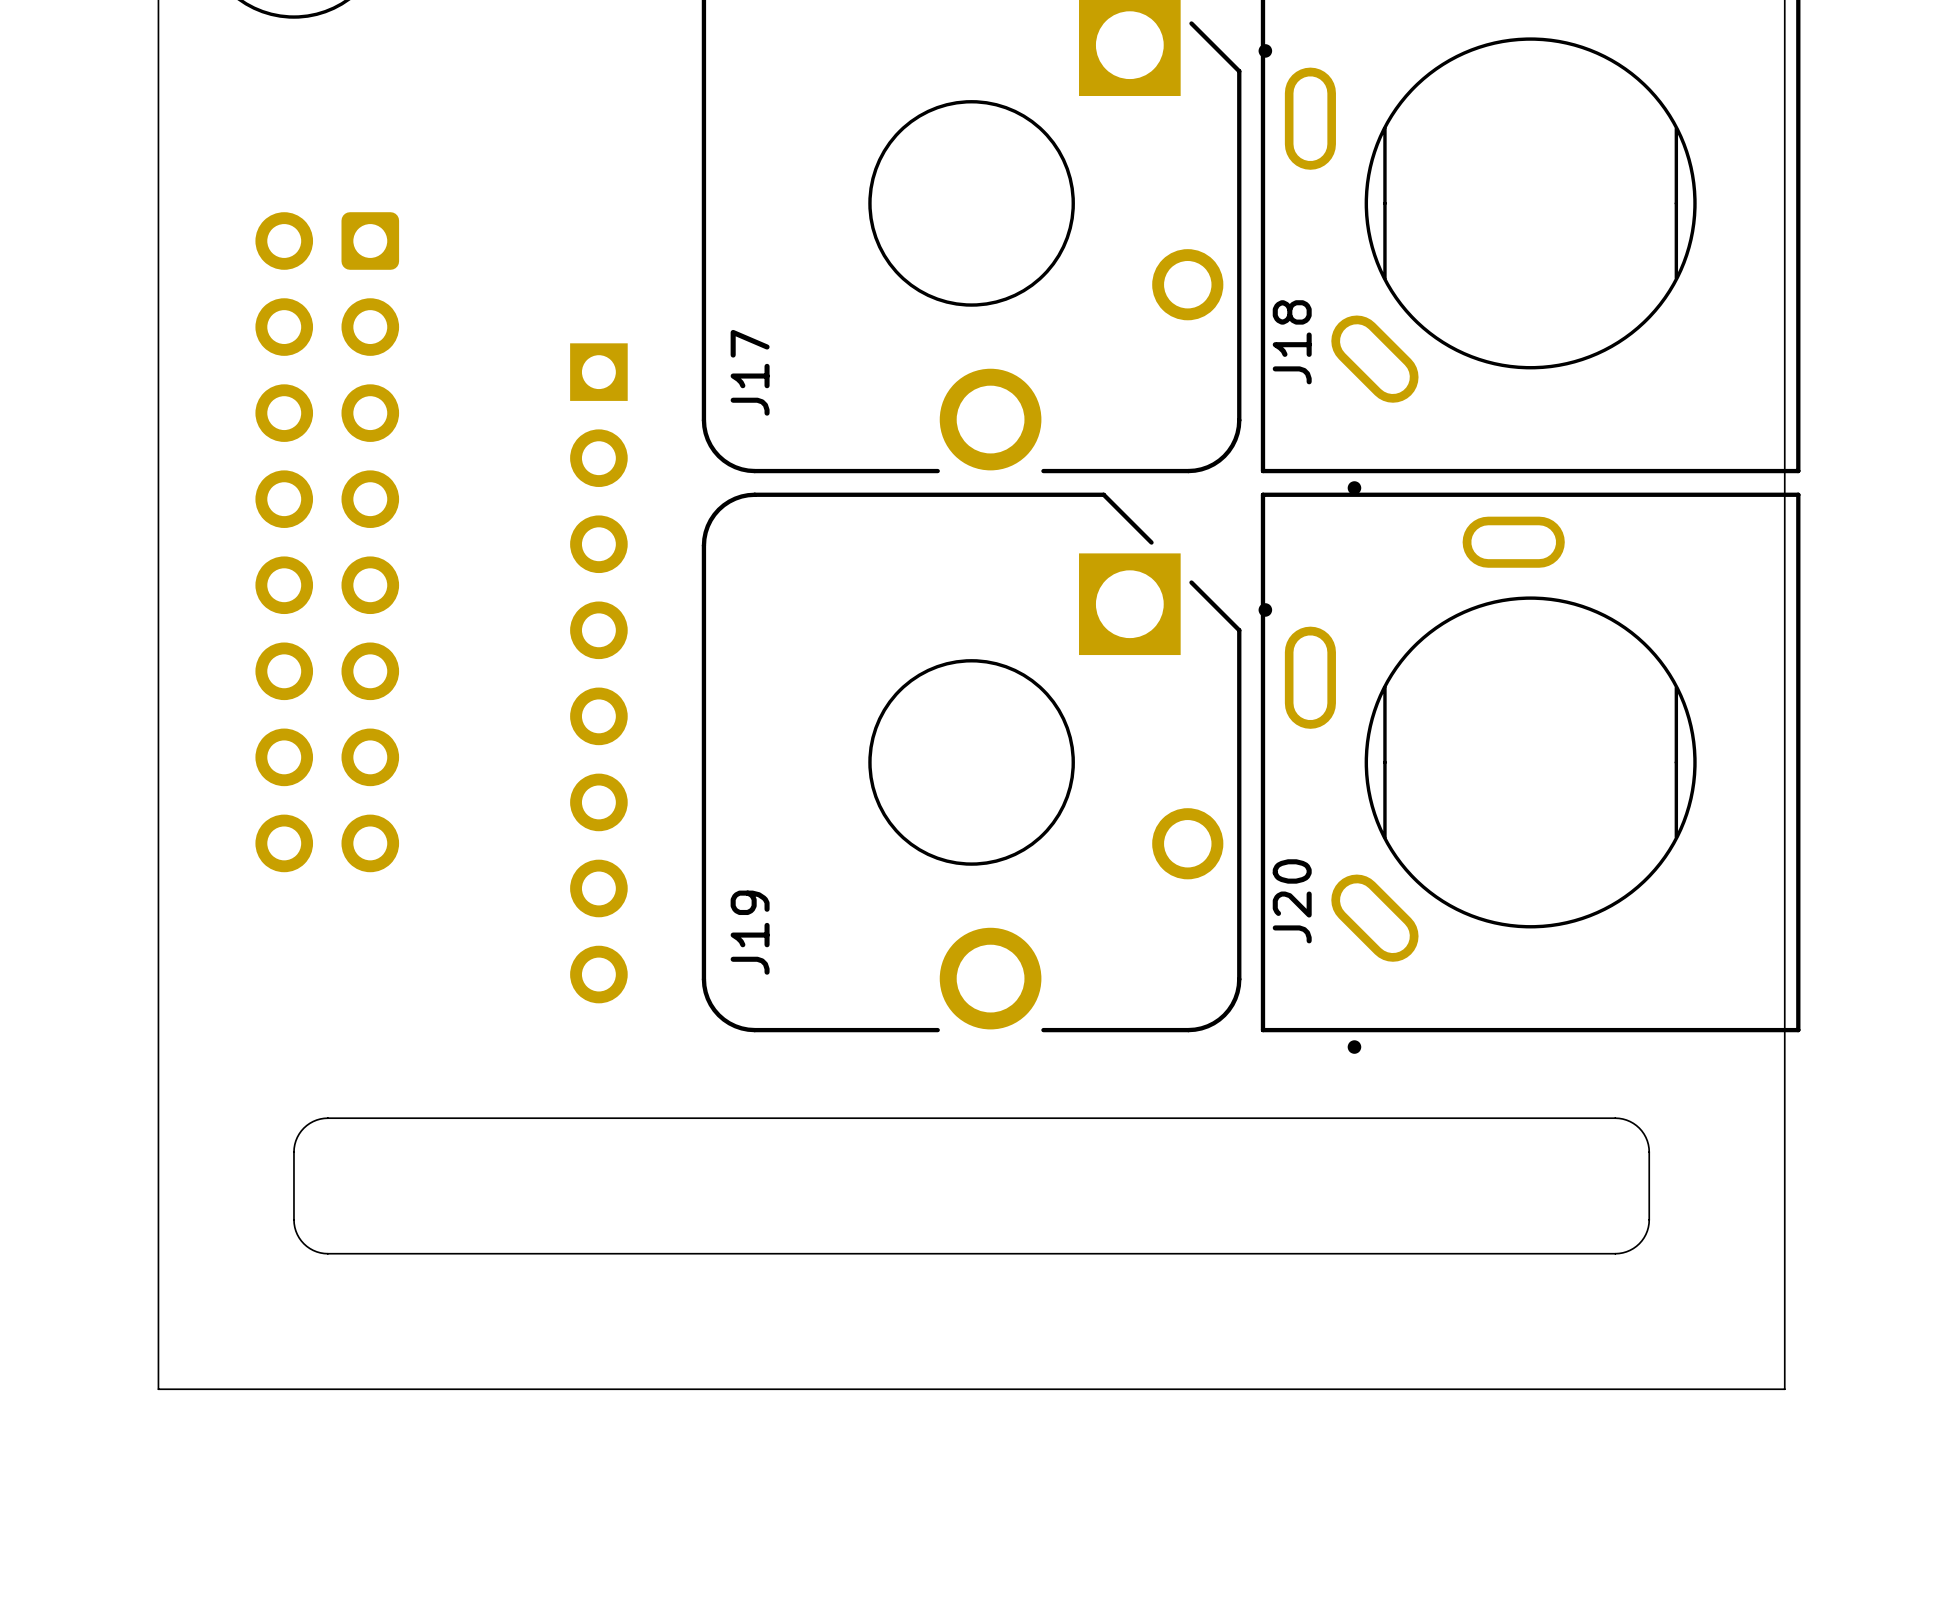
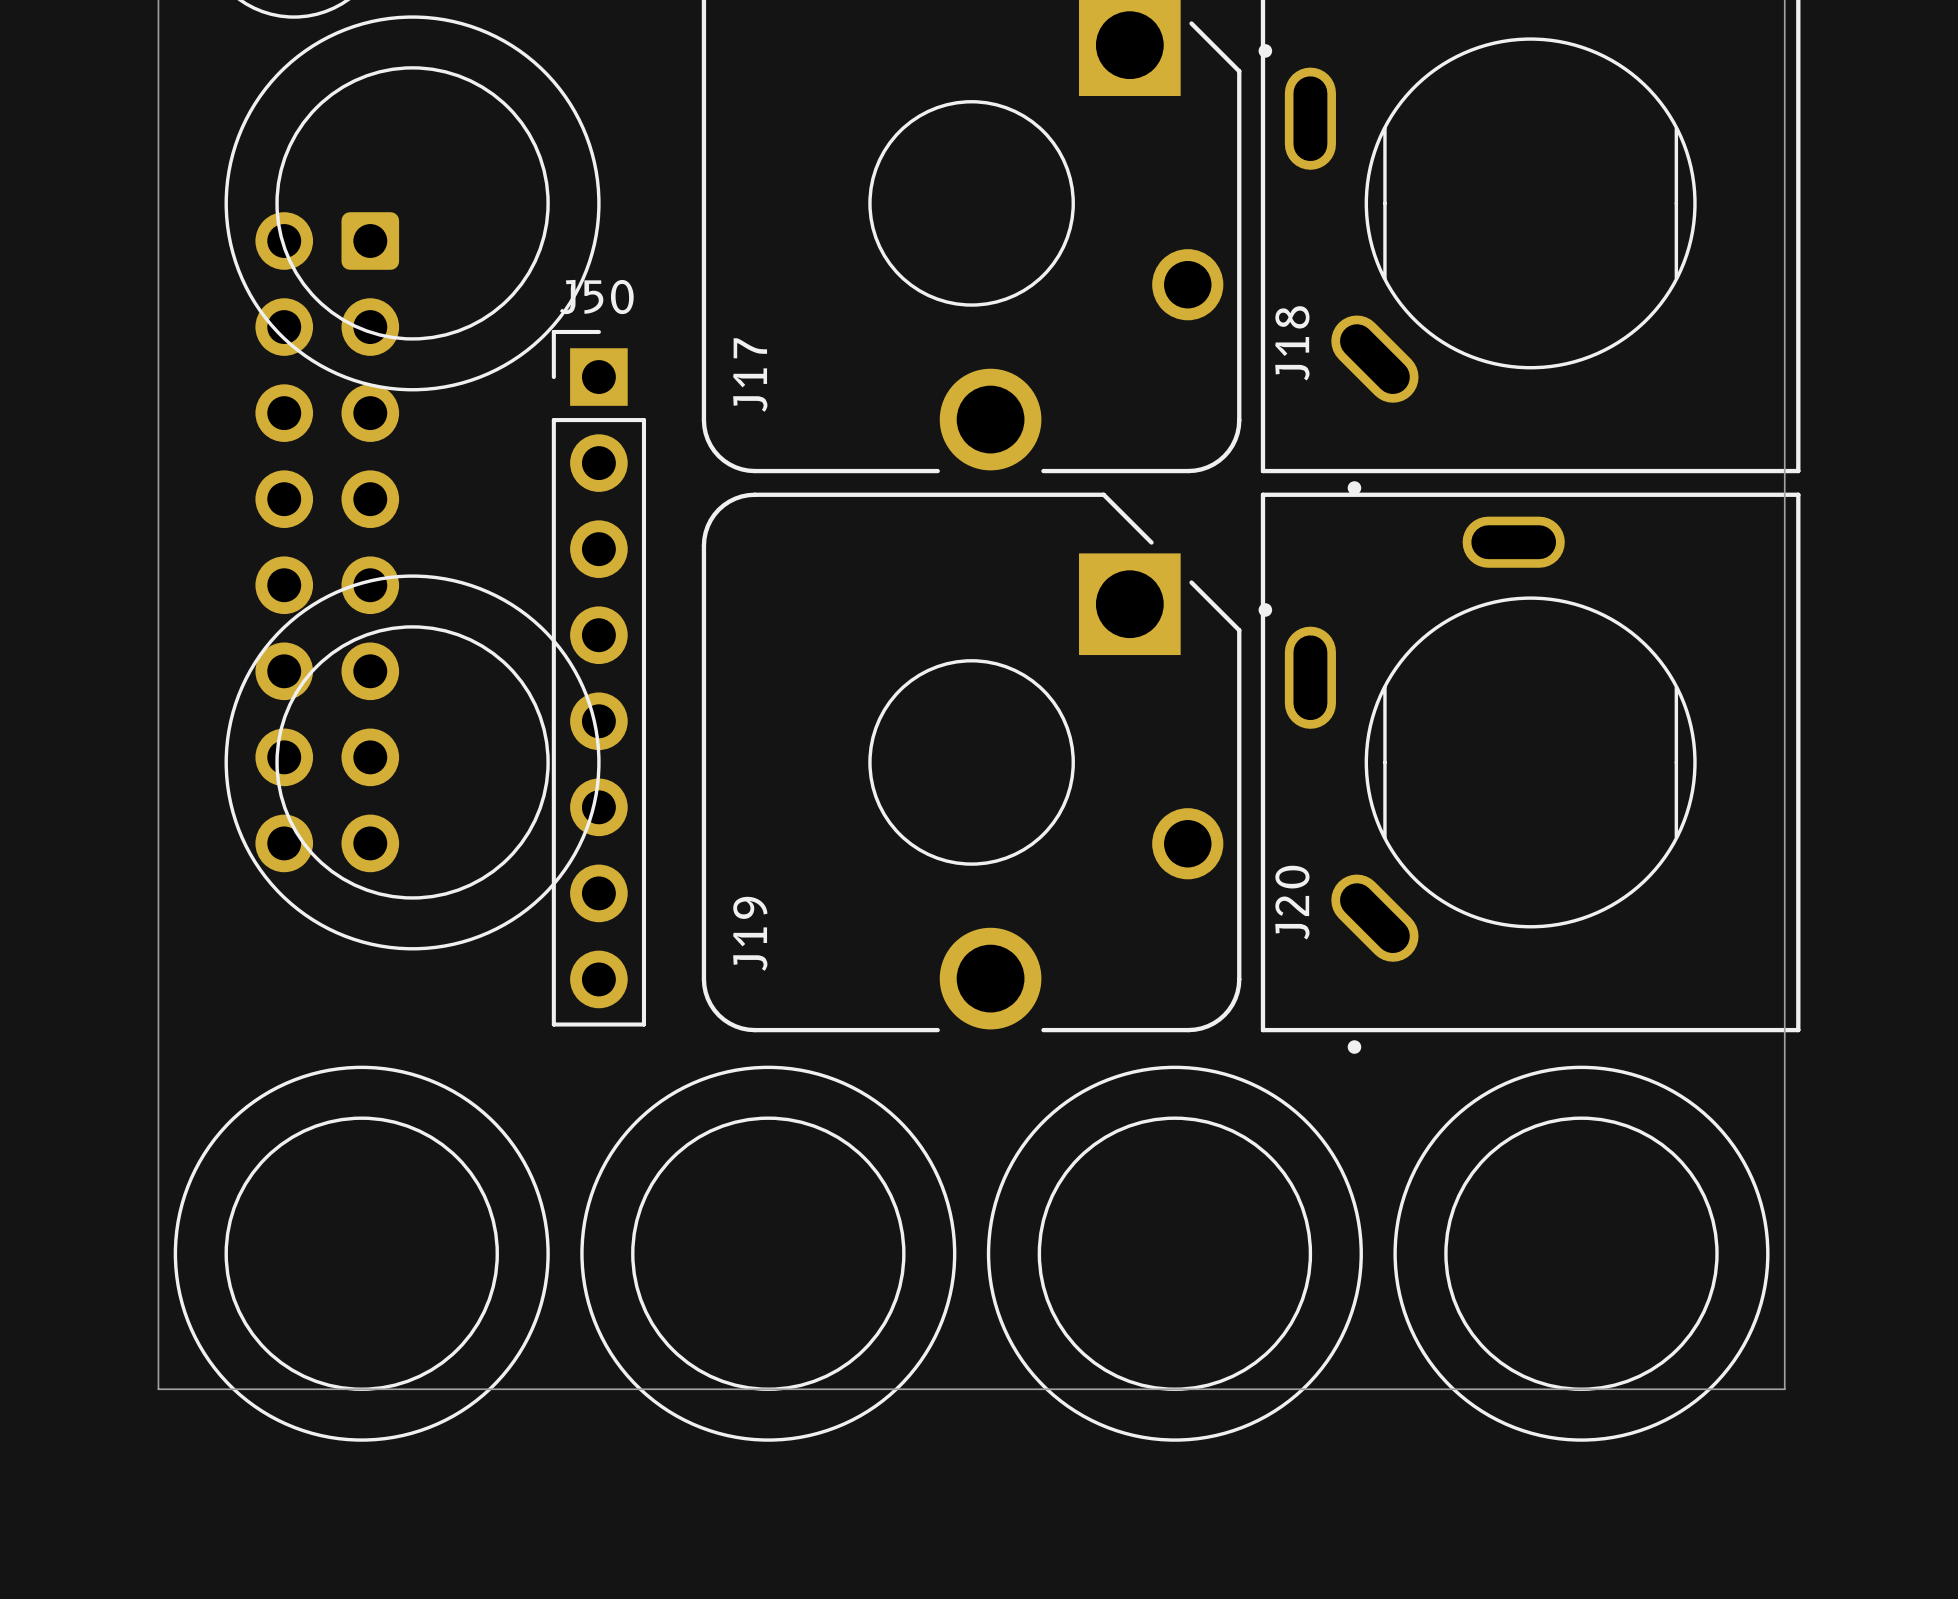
drawing: none -> [224, 15, 601, 392]
drawing: none -> [224, 574, 601, 951]
J50 side: bottom (598, 673) -> top (598, 678)
drawing: none -> [173, 1065, 1770, 1442]
board edge: (327, 1118) (1619, 1118) (1630, 1121) (1639, 1128) (1648, 1144) (1649, 1223) (1645, 1234) (1639, 1243) (1630, 1250) (1615, 1253) (324, 1253) (306, 1246) (295, 1231) (293, 1219) (293, 1152) (297, 1137) (303, 1128) (313, 1121) (327, 1118) -> none

